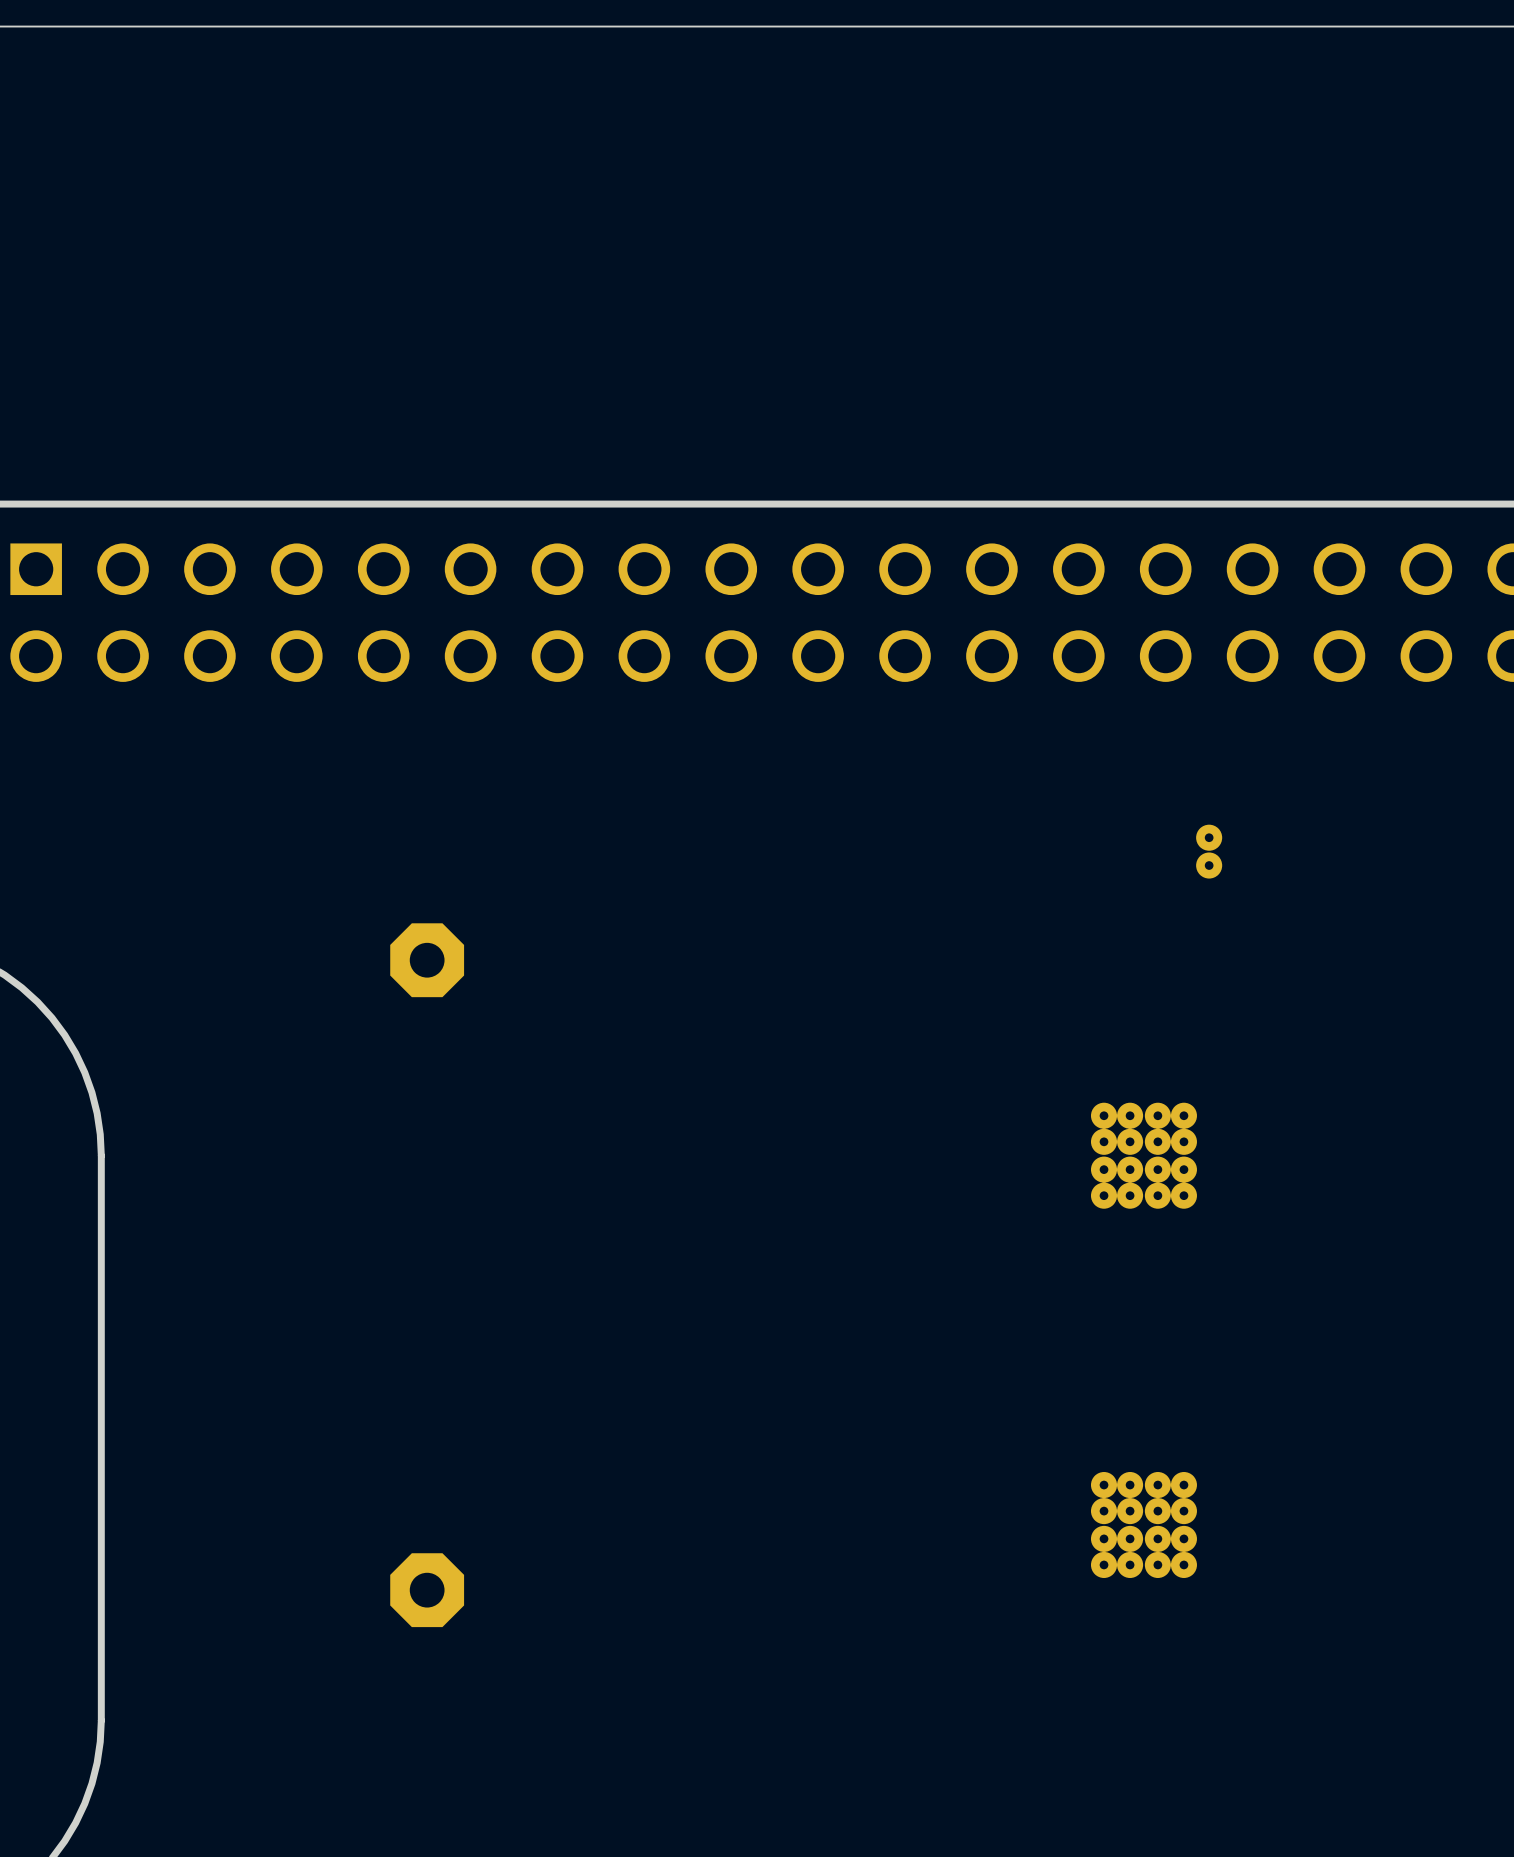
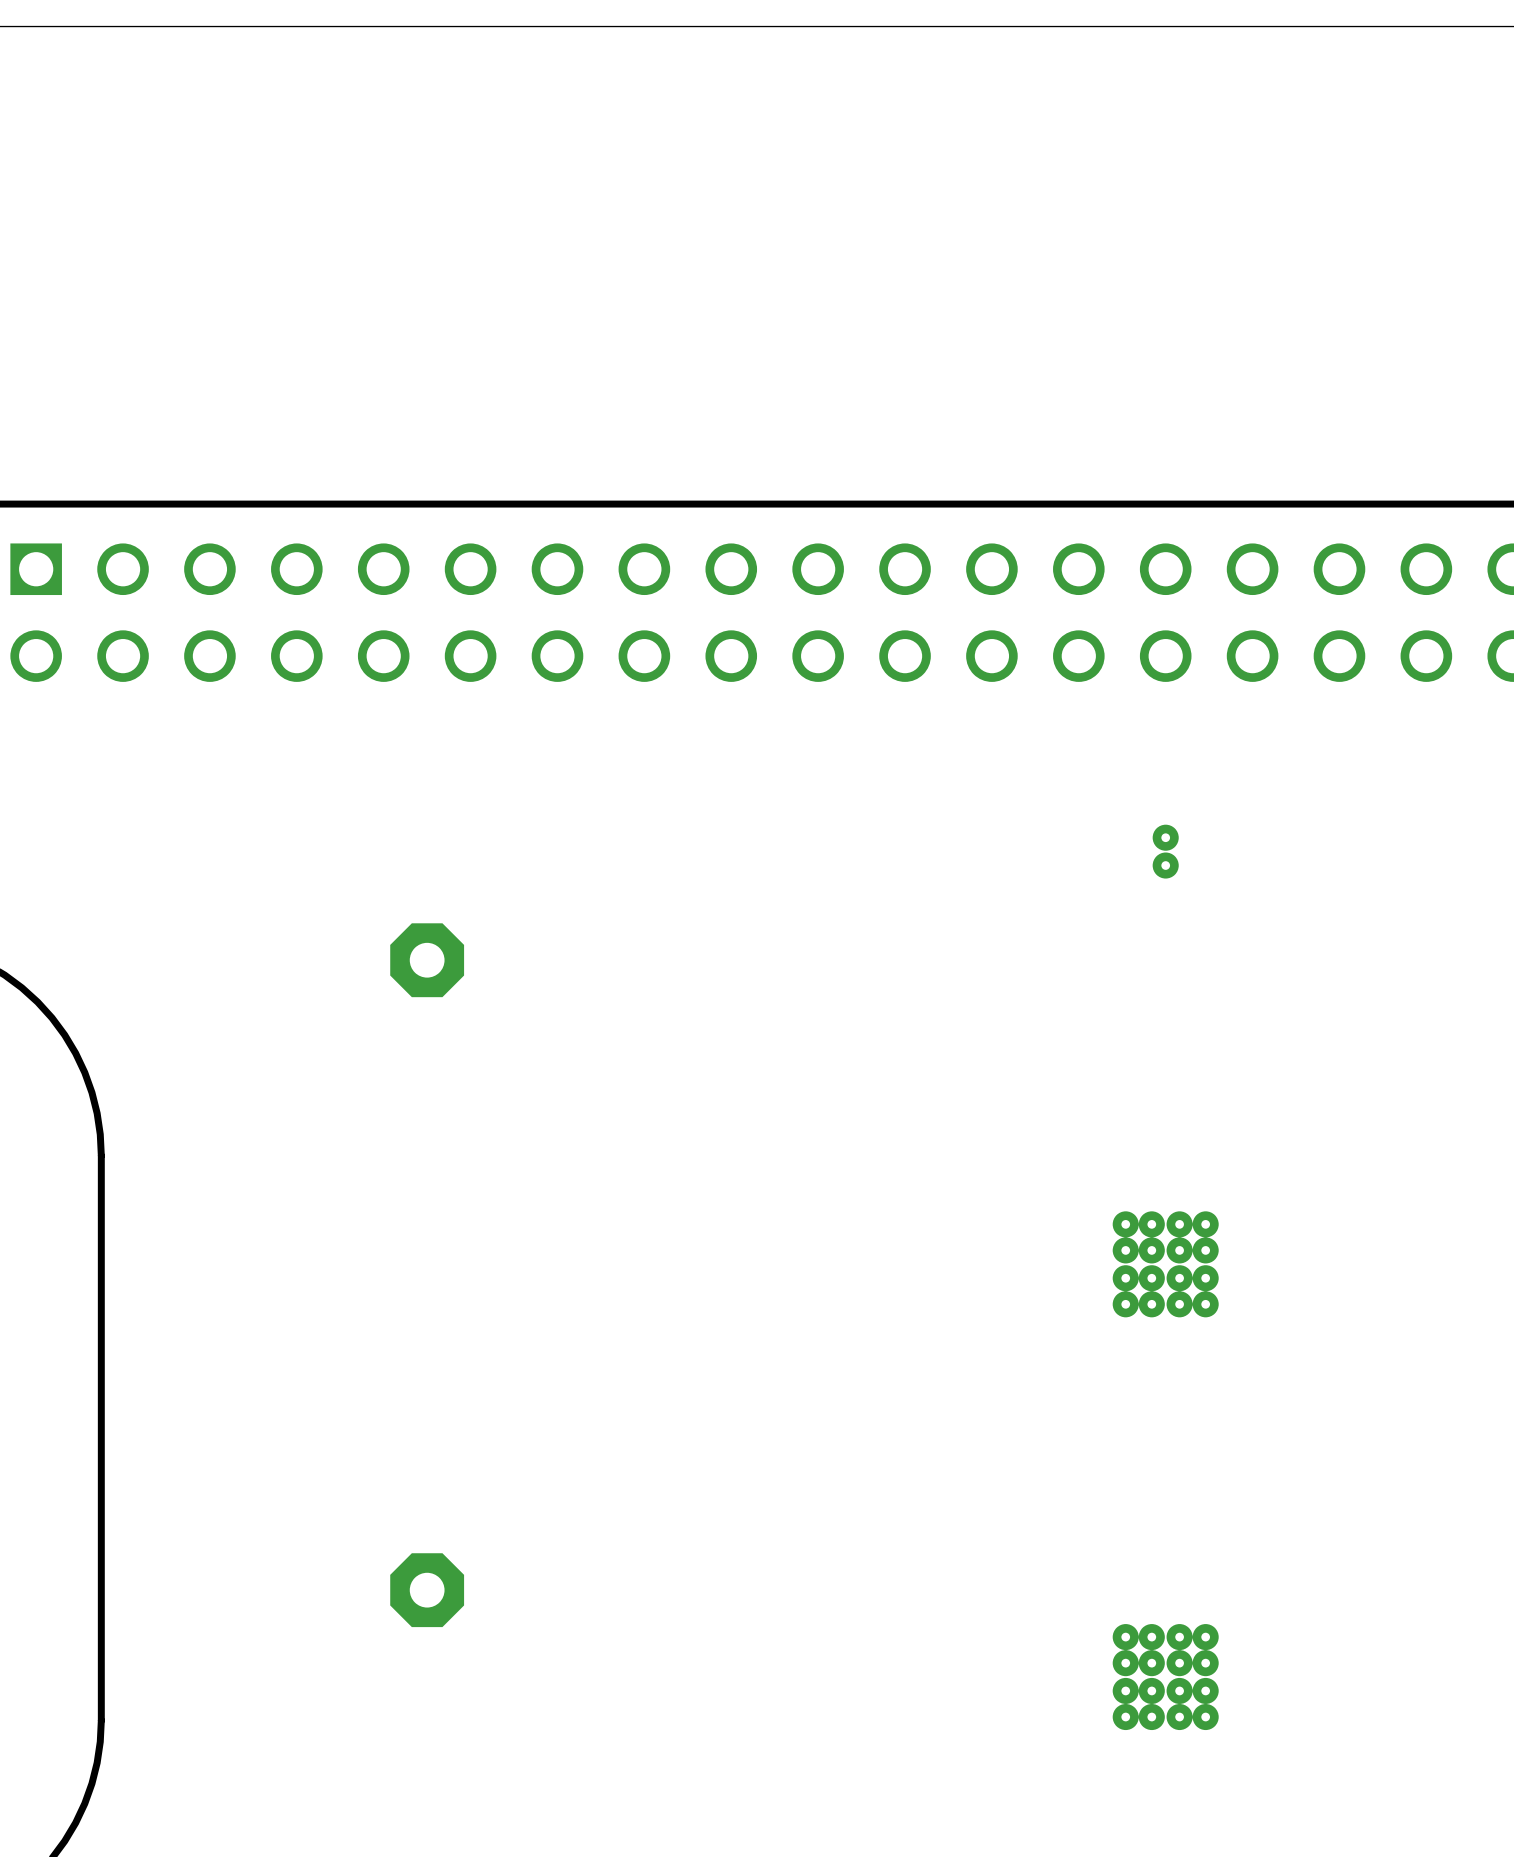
part position: (1209, 851) -> (1165, 851)
part position: (1143, 1155) -> (1165, 1264)
part: (1143, 1525) -> none
part: none -> (1165, 1677)

